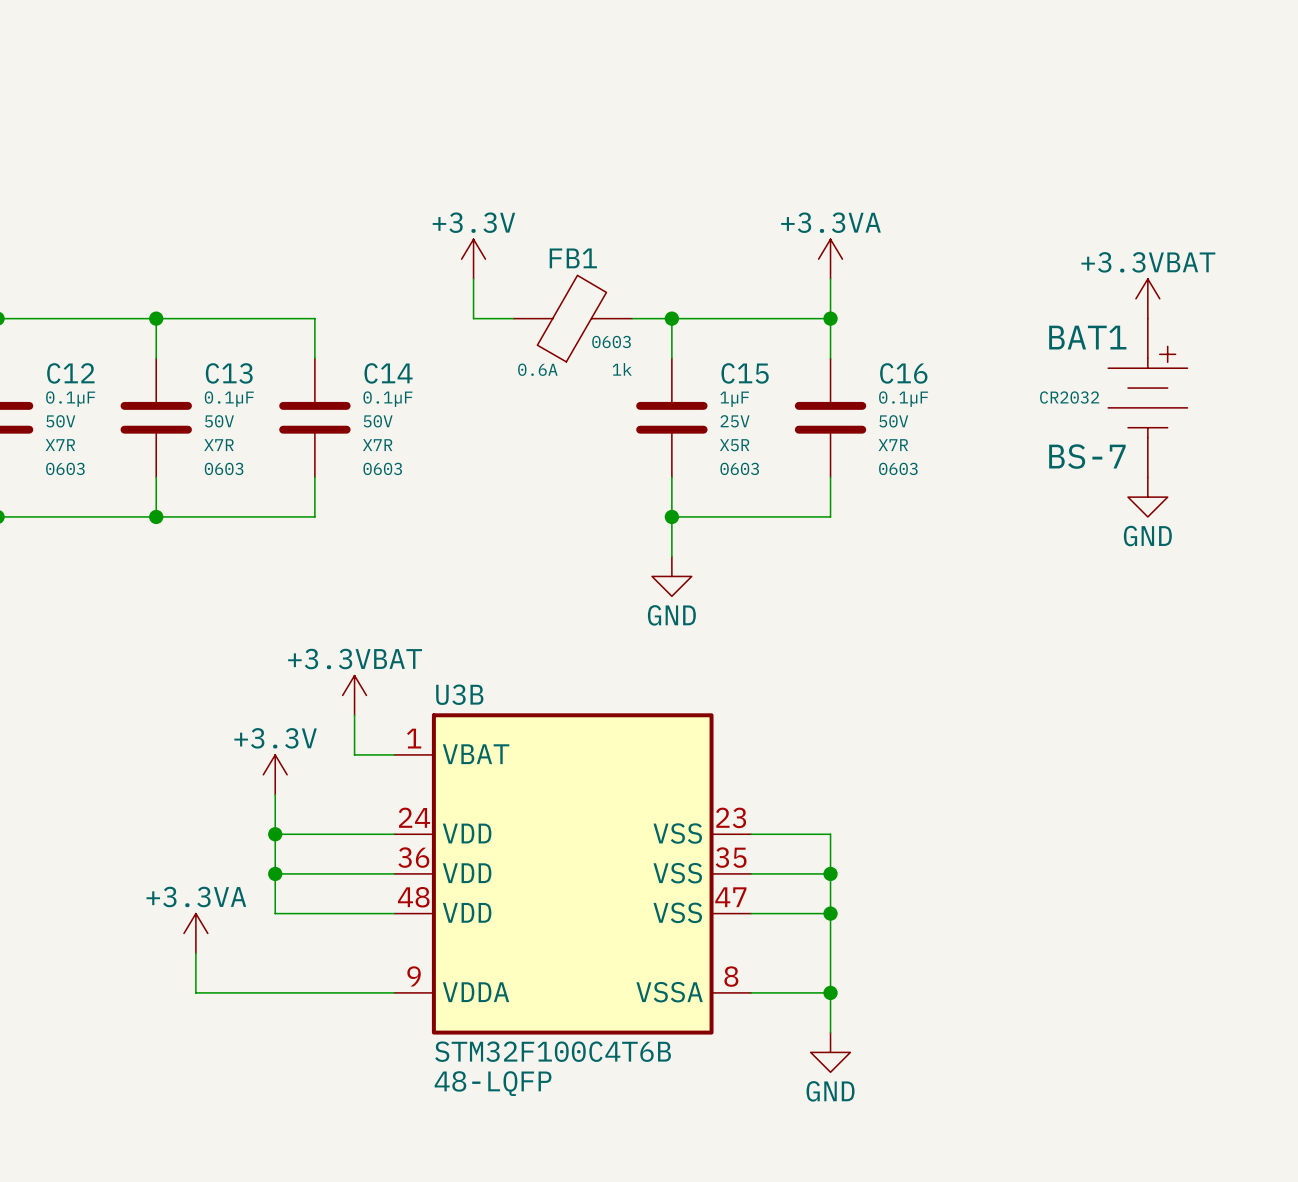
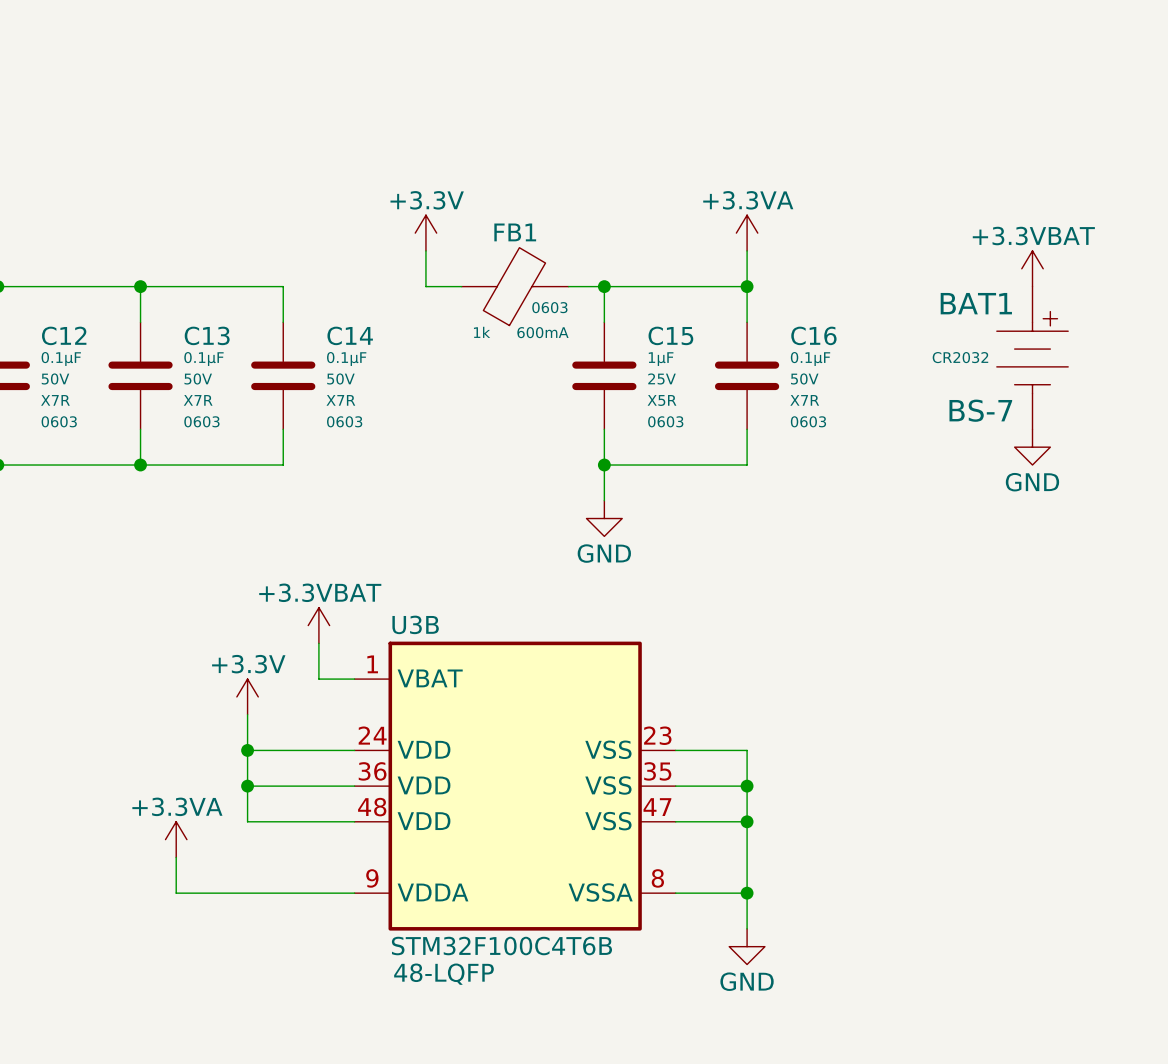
FB1 text: 0.6A (537, 369) -> 600mA (542, 332)
FB1 text position: 1k (622, 369) -> 1k (482, 332)

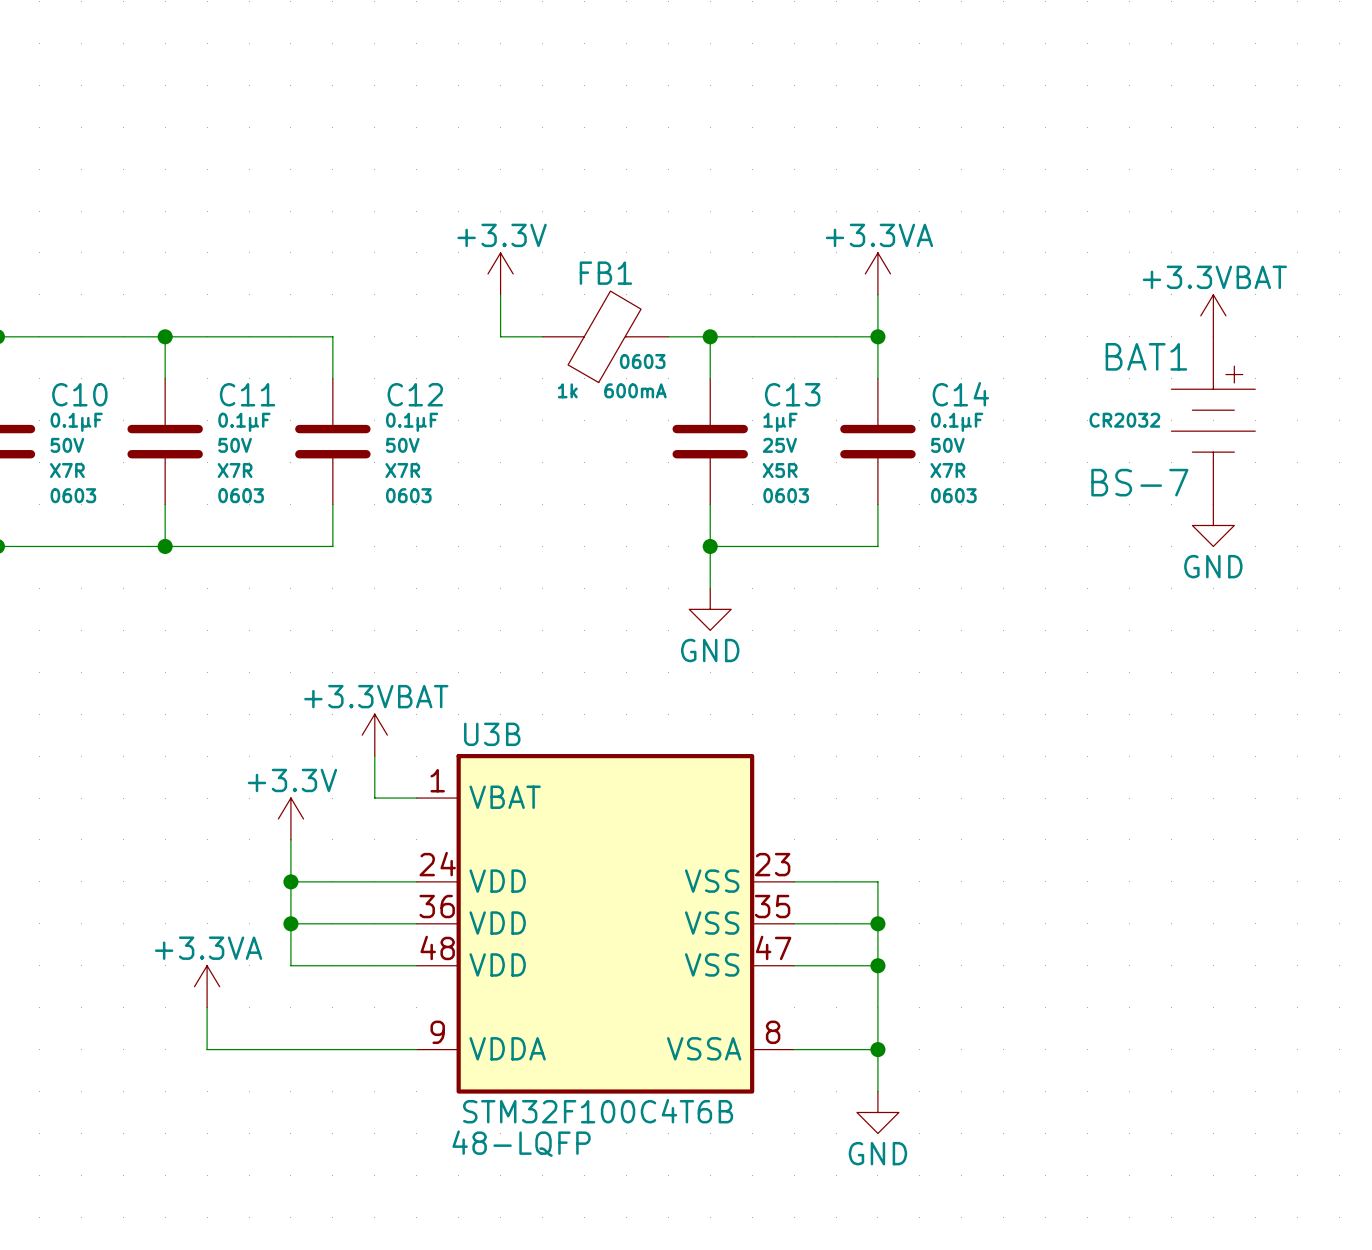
C12 name: C12 (64, 335) -> C10 (79, 394)
C13 name: C13 (207, 335) -> C11 (247, 394)
C14 name: C14 (350, 335) -> C12 (415, 394)
C15 name: C15 (670, 335) -> C13 (792, 394)
C16 name: C16 (813, 335) -> C14 (960, 394)

